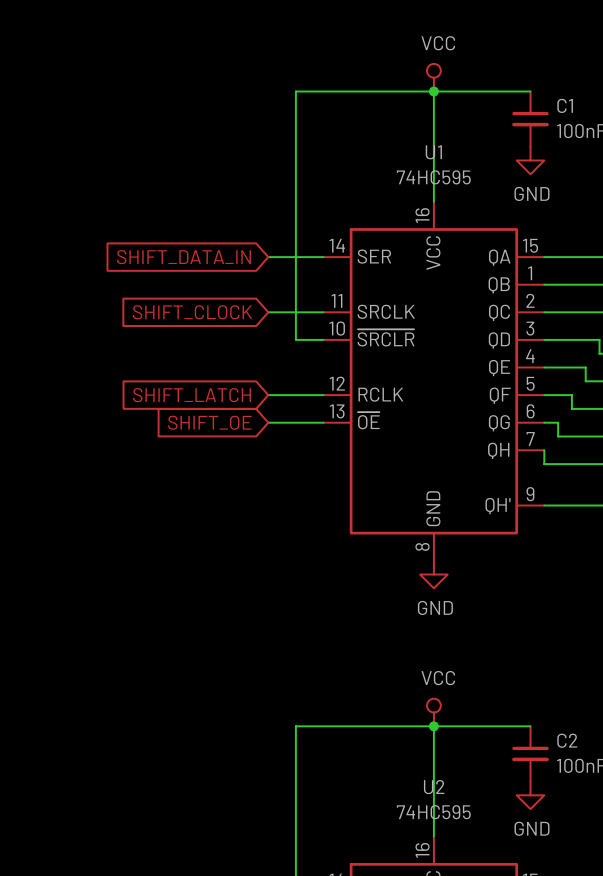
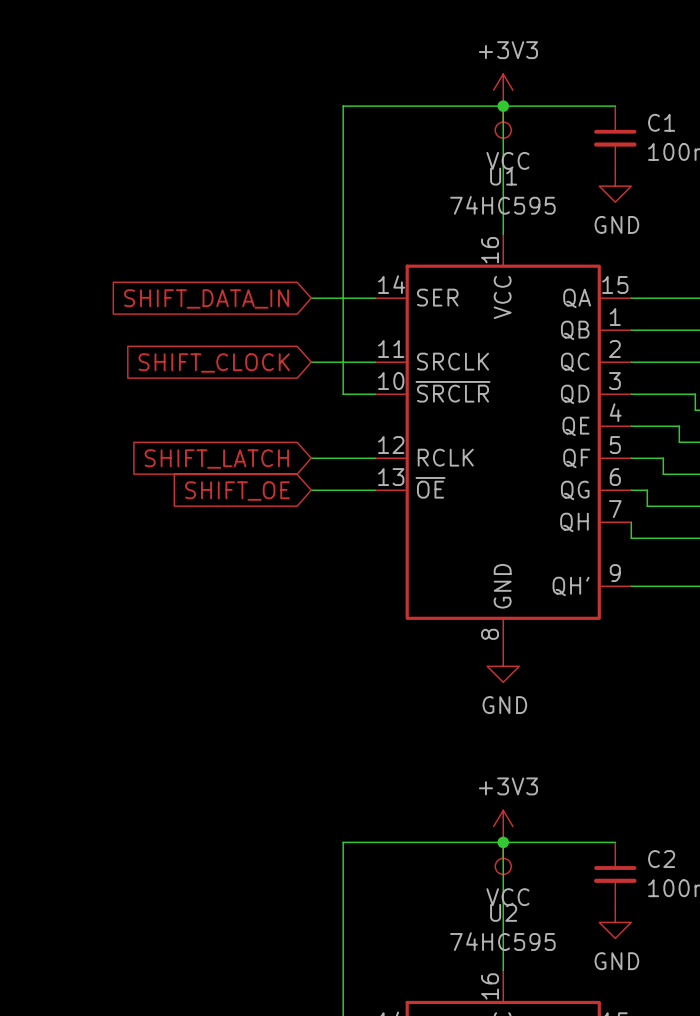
power symbol: VCC (433, 77) -> +3V3 (503, 90)
power symbol: none -> VCC (503, 122)
power symbol: VCC (433, 712) -> +3V3 (503, 826)
power symbol: none -> VCC (503, 858)

